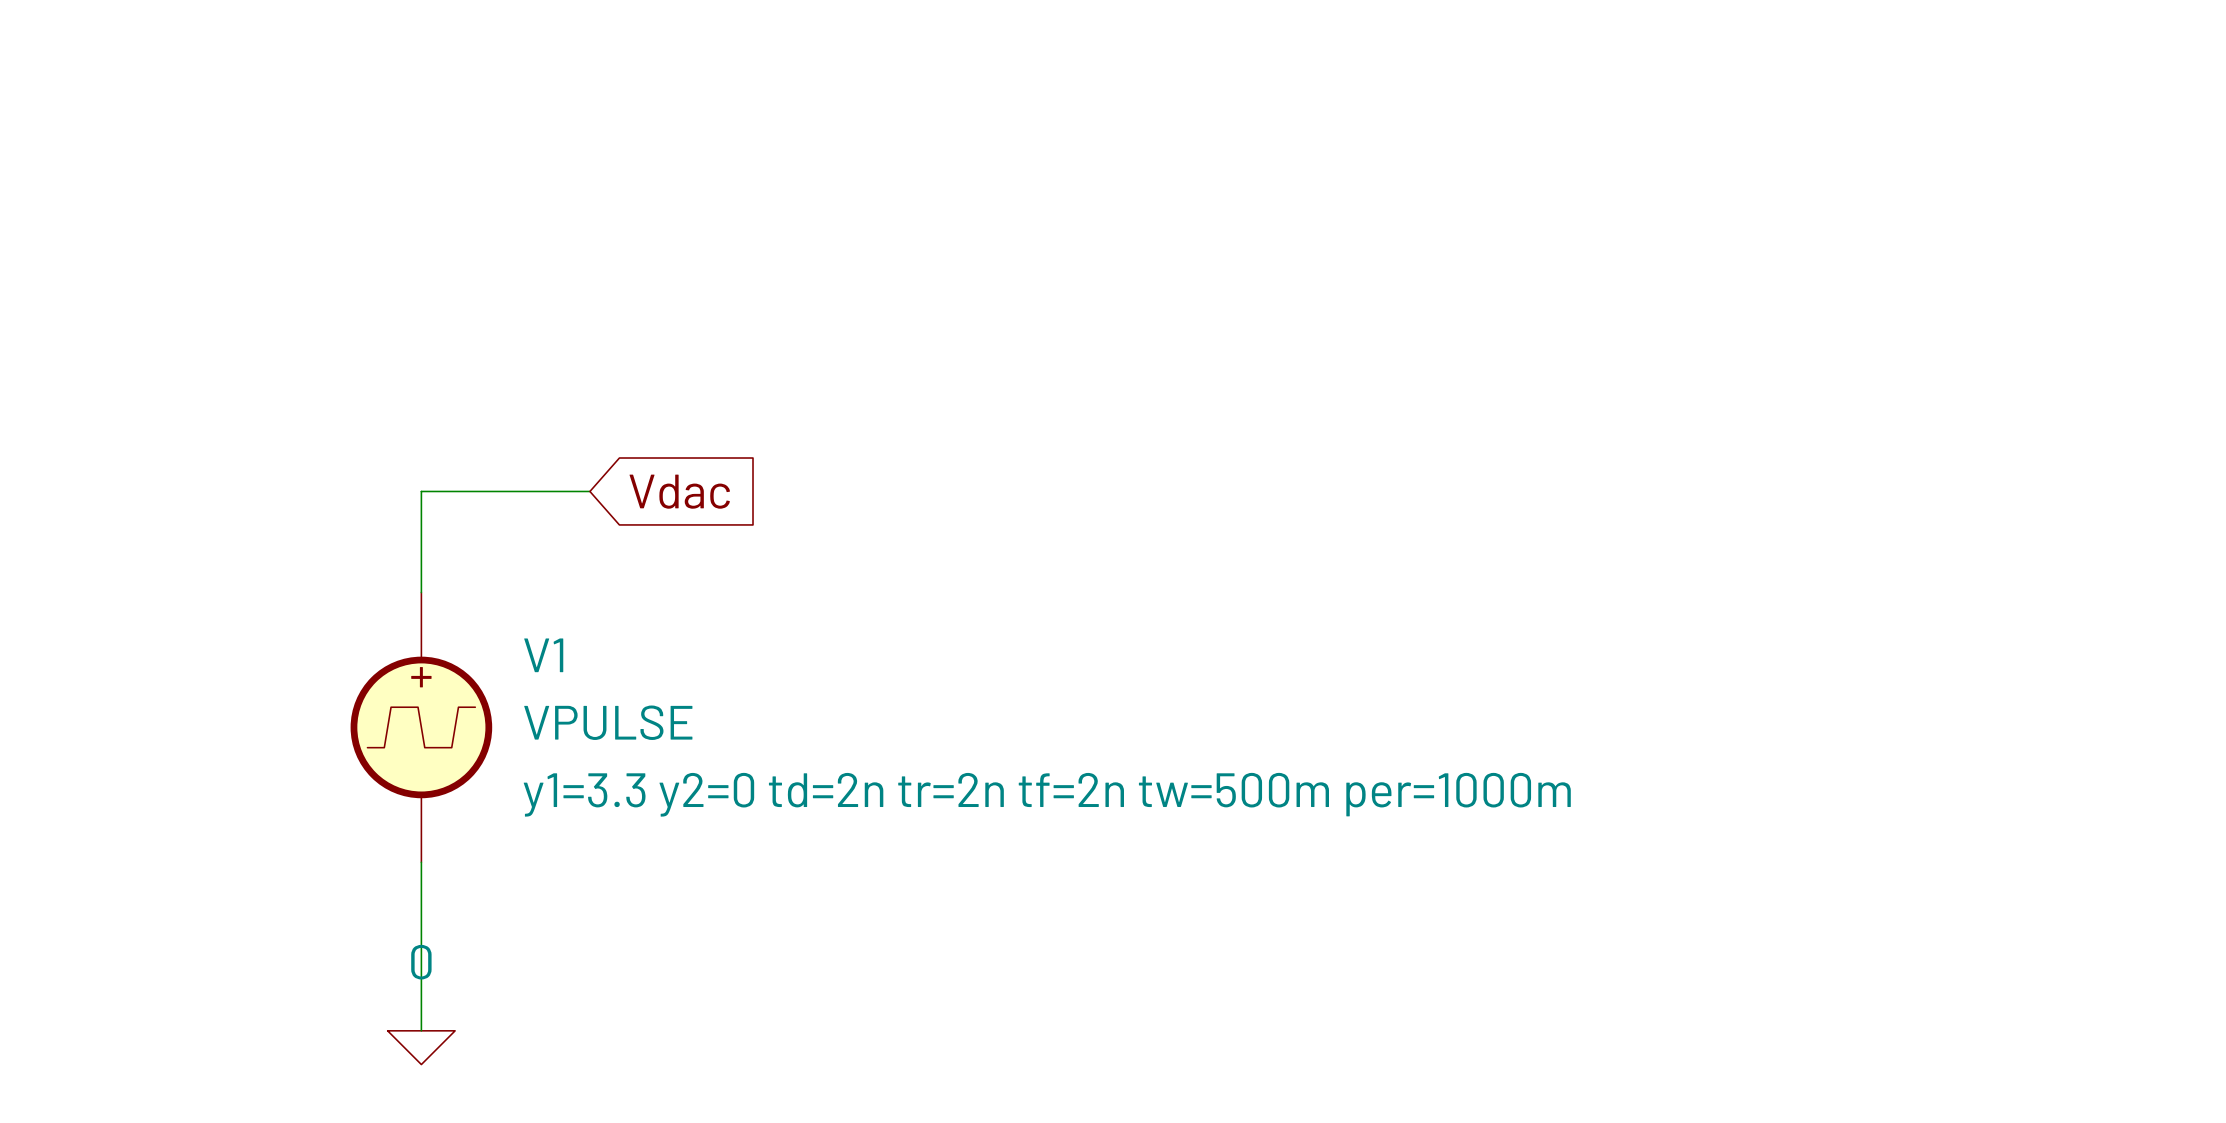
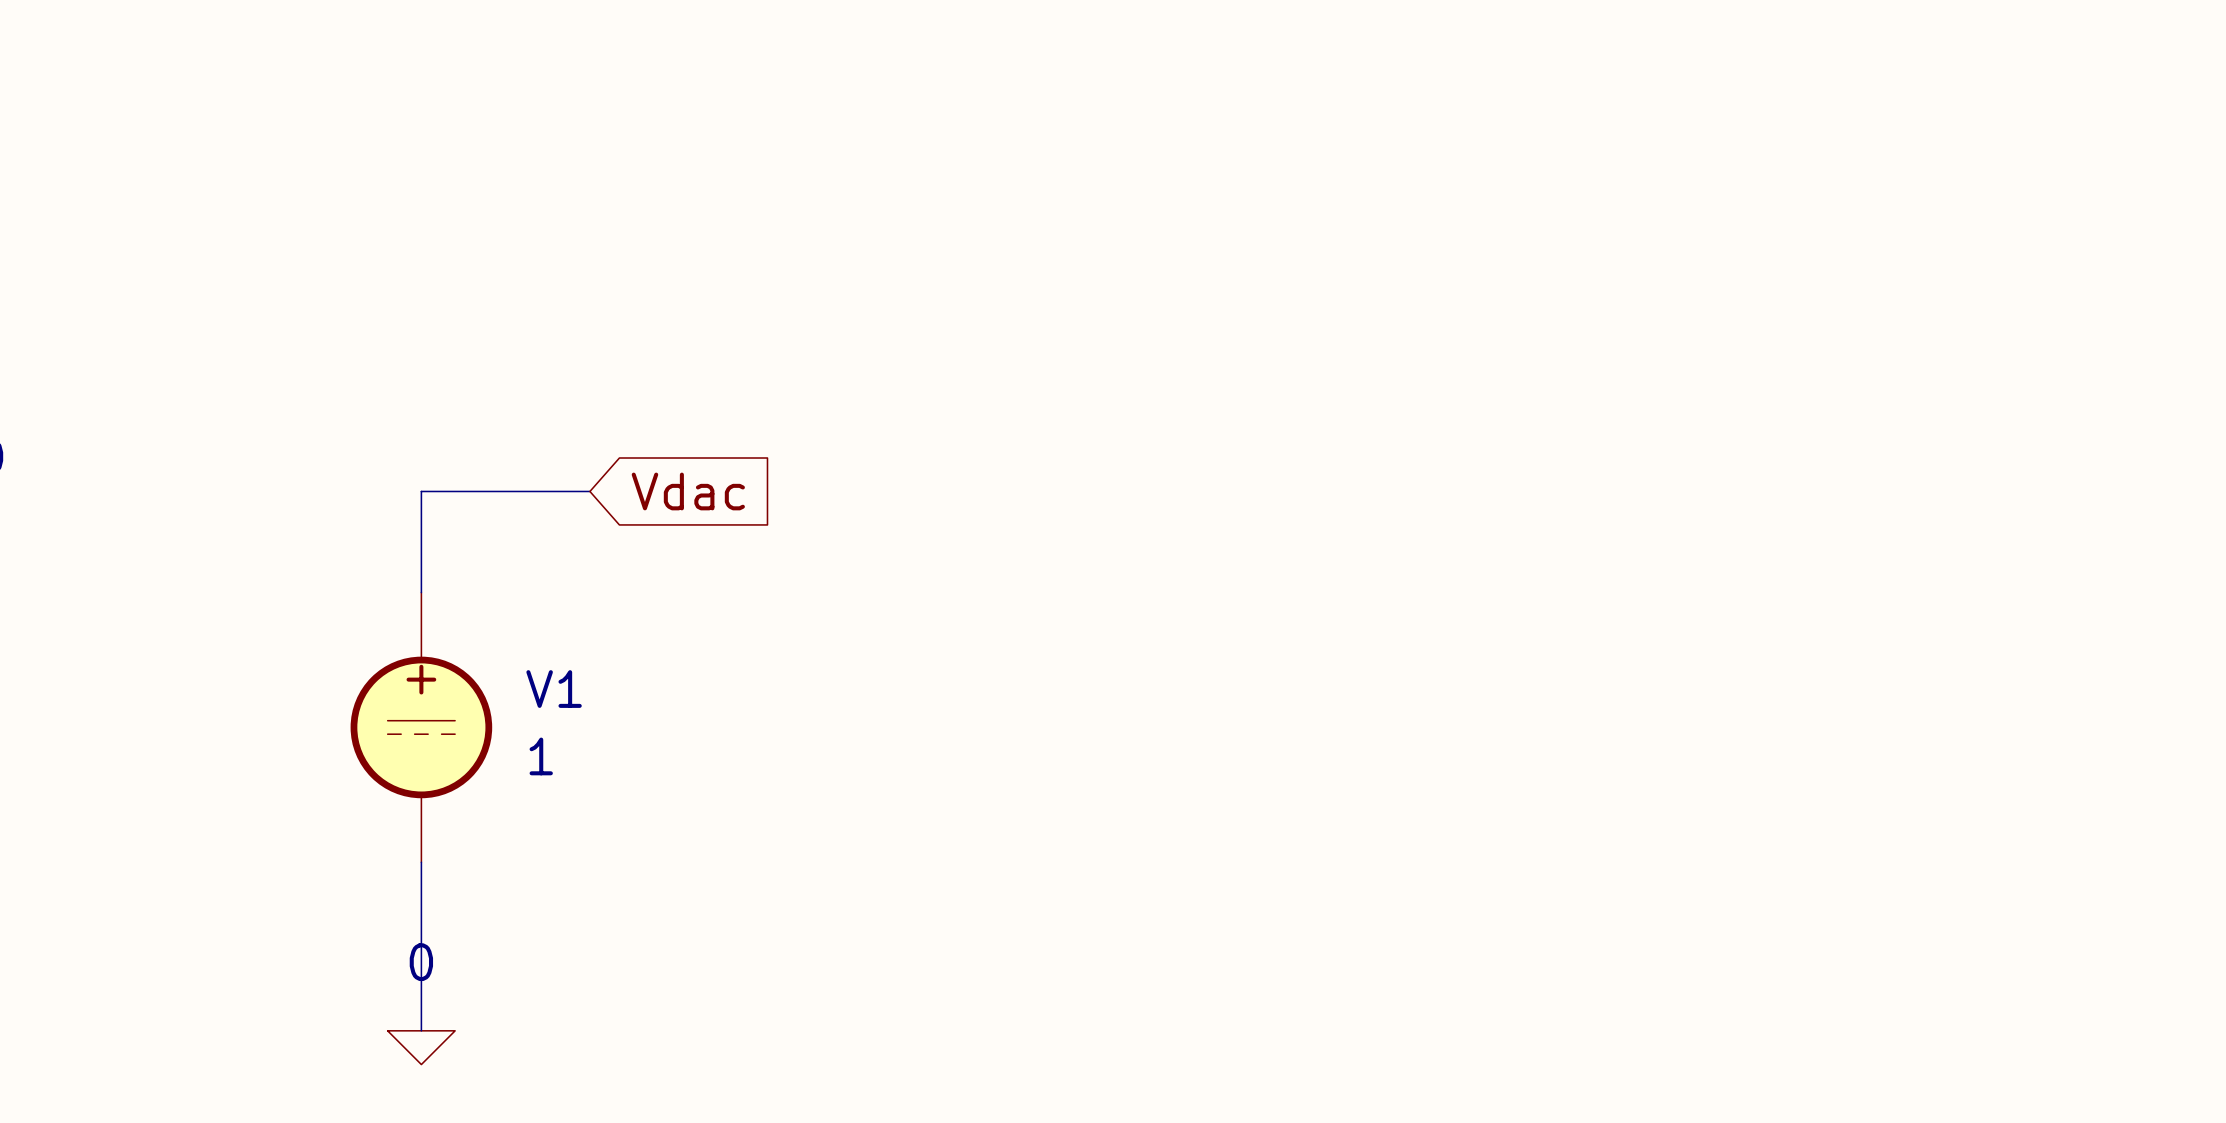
V1 symbol: [350, 592, 493, 863] -> [350, 592, 493, 863]
V1 name position: V1 (543, 655) -> V1 (554, 689)
V1 value: VPULSE (608, 722) -> 1 (541, 756)
V1 text: y1=3.3 y2=0 td=2n tr=2n tf=2n tw=500m per=1000m (1047, 794) -> none

